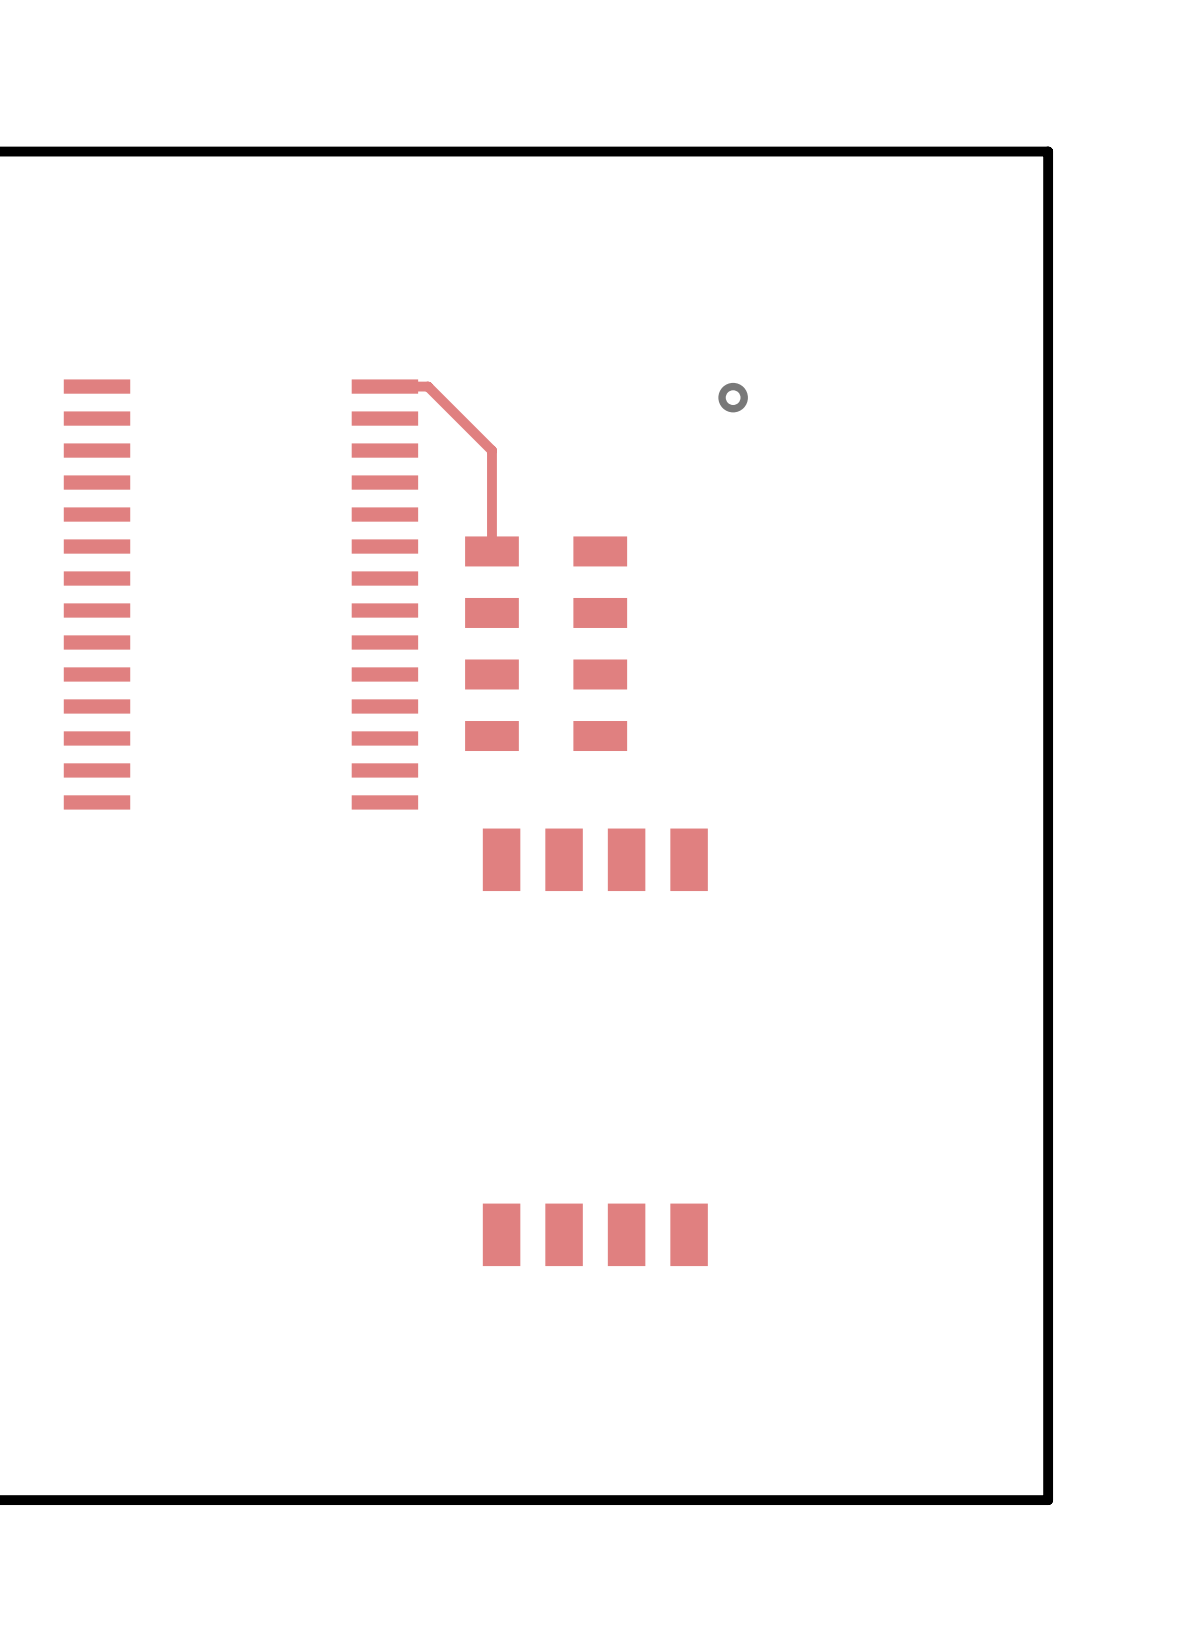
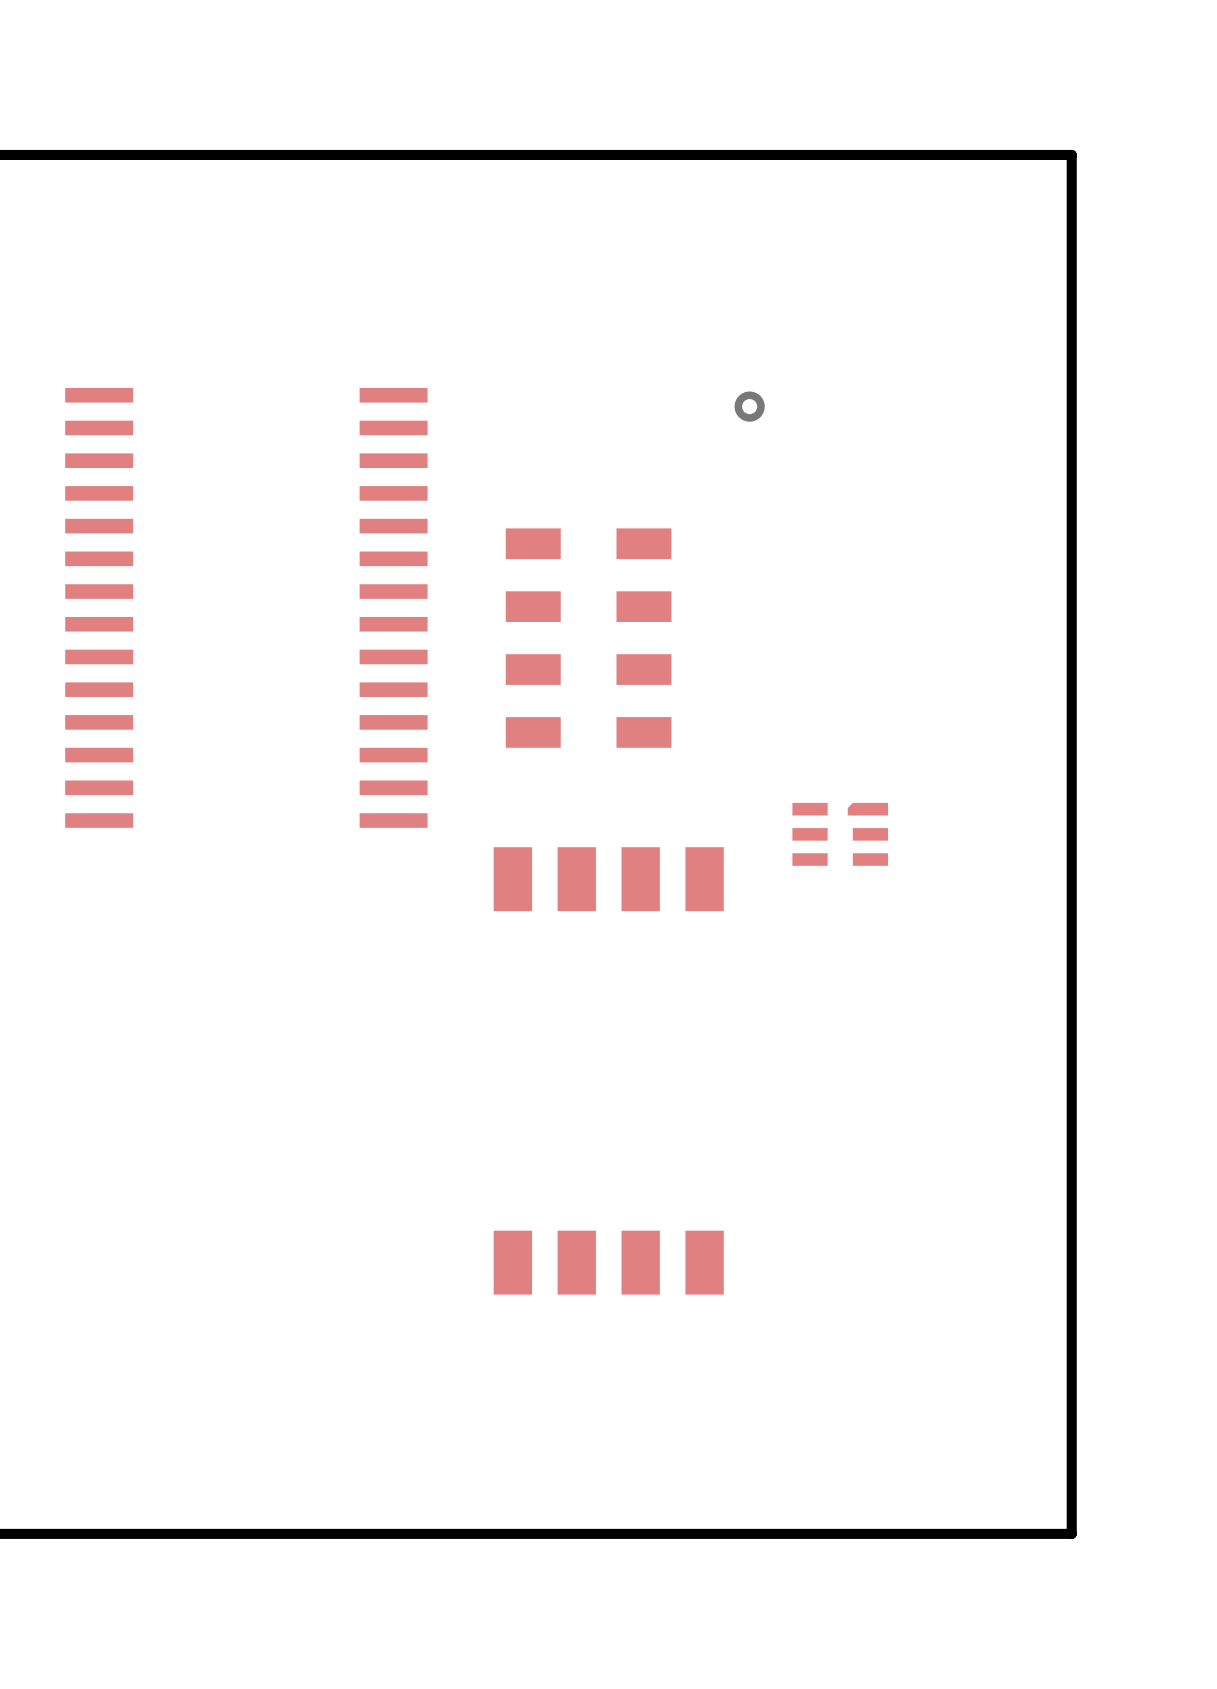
top track: (384, 386) (427, 386) (491, 450) (491, 551) -> none
part position: (546, 643) -> (588, 638)
part: none -> (840, 834)

